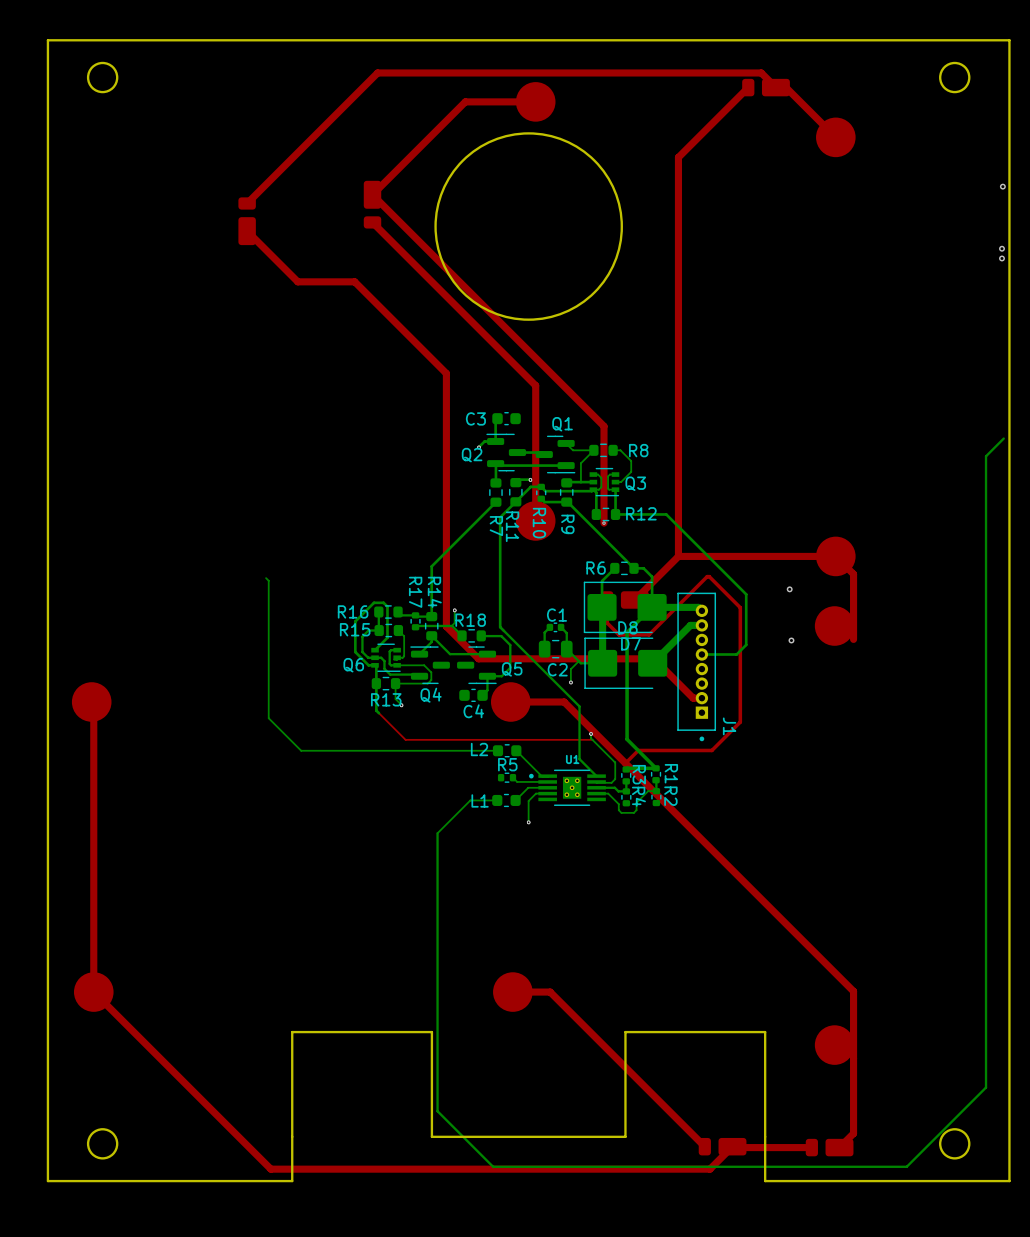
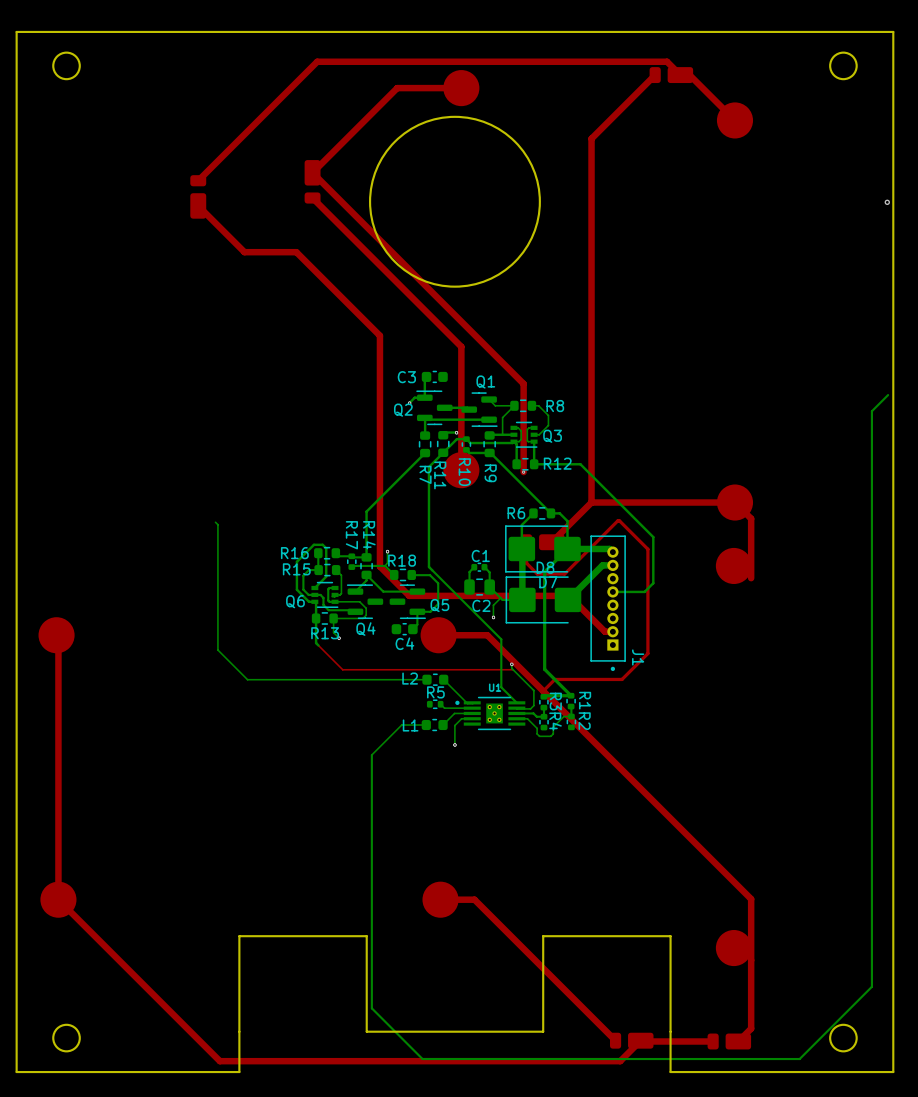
via: (1002, 186) -> none
via: none -> (887, 202)
via: (1001, 248) -> none
via: (1001, 258) -> none
via: (789, 589) -> none
via: (791, 640) -> none

